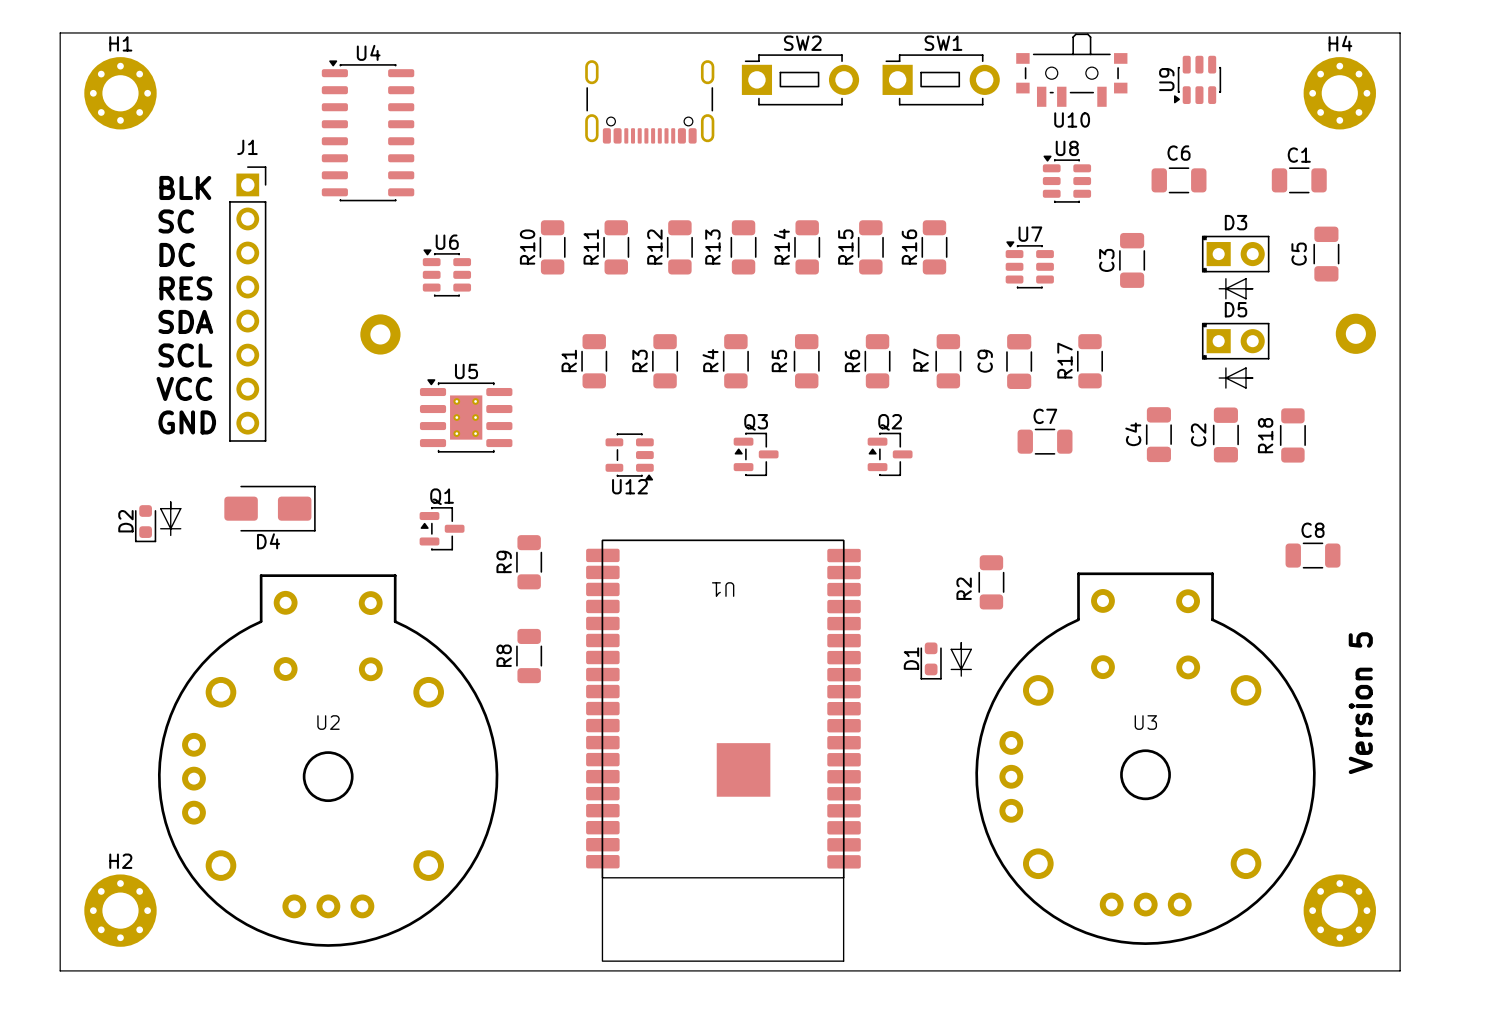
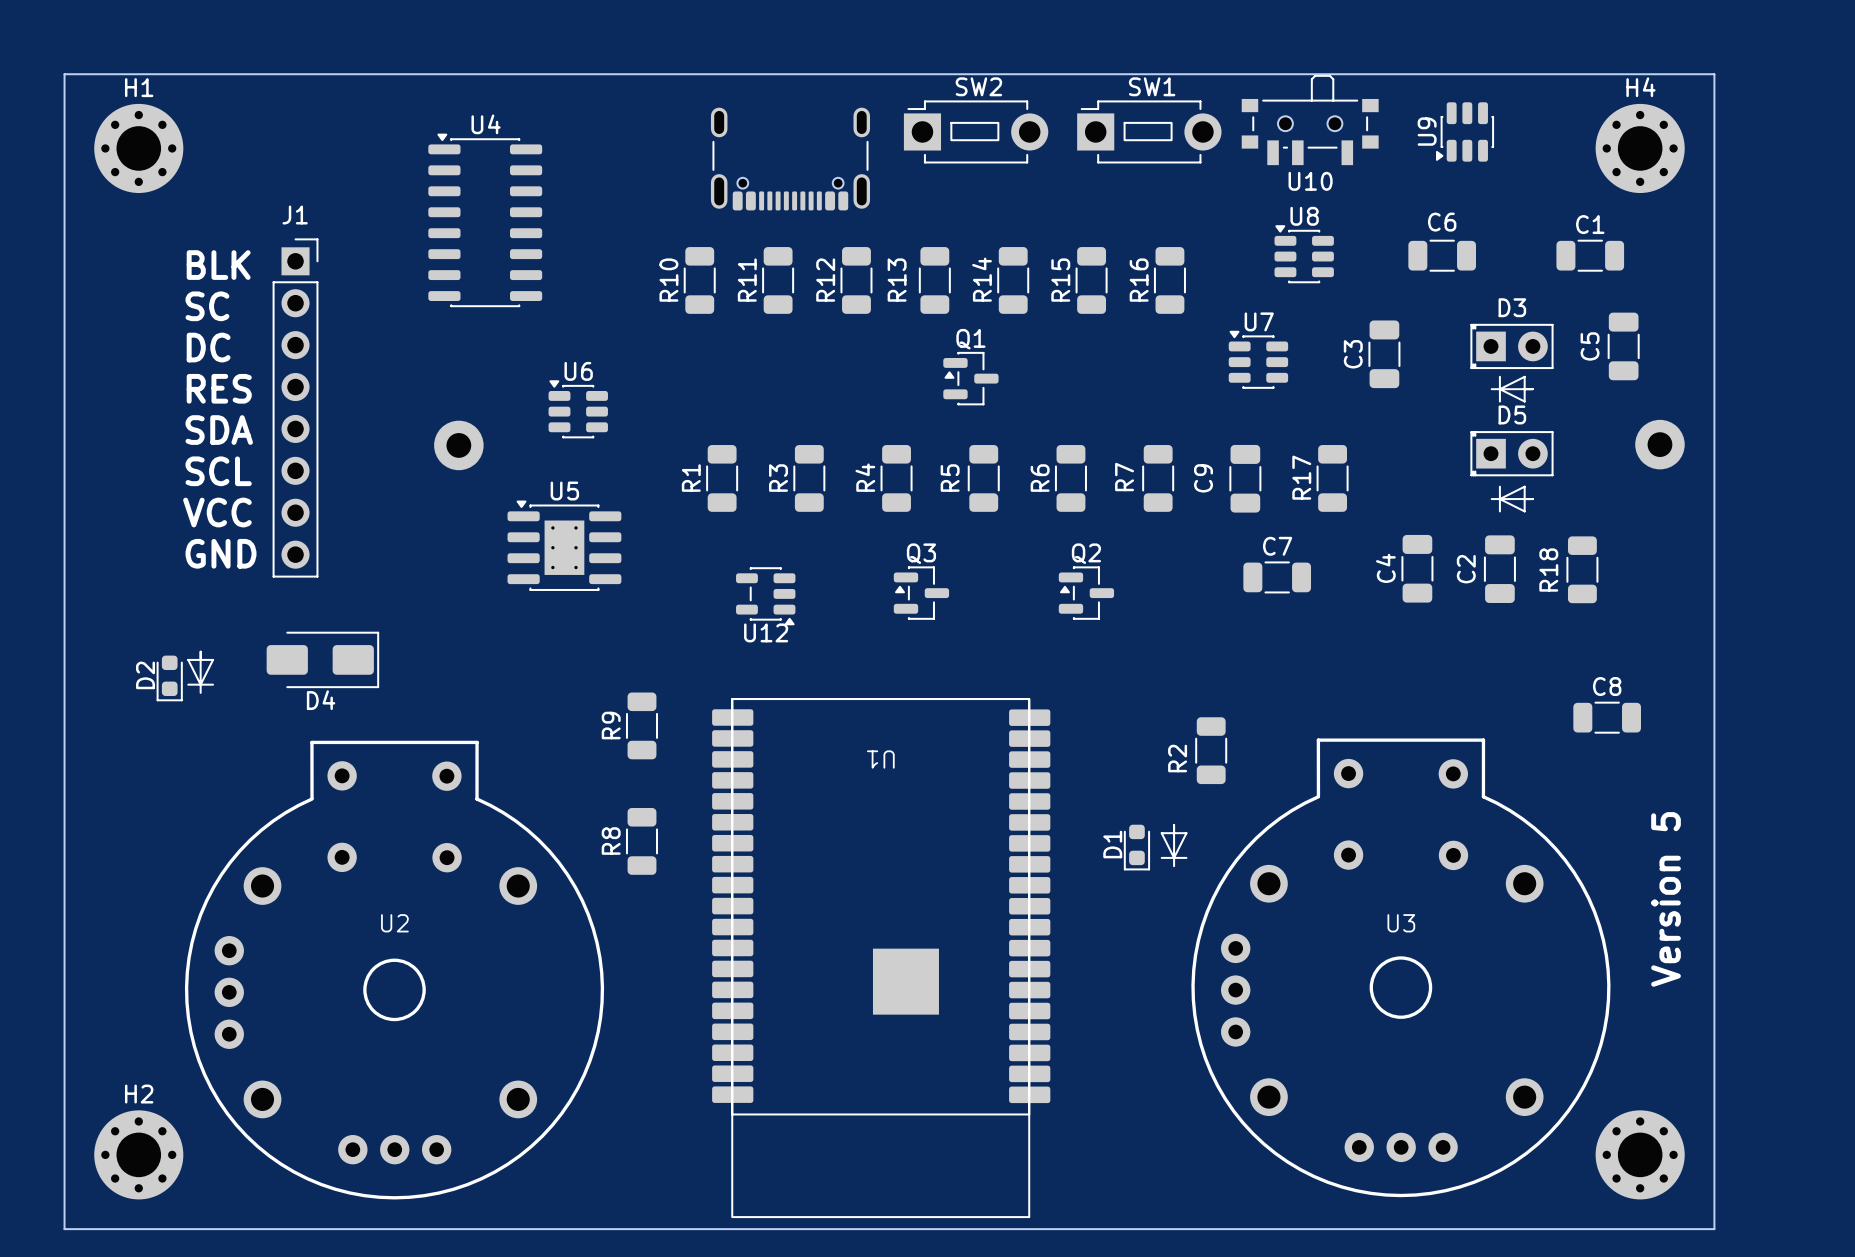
U4 position: (368, 130) -> (485, 220)
R10 position: (552, 247) -> (699, 280)
R11 position: (616, 247) -> (778, 280)
R12 position: (679, 247) -> (856, 280)
R13 position: (743, 247) -> (934, 280)
R14 position: (807, 247) -> (1013, 280)
R15 position: (870, 247) -> (1091, 280)
R16 position: (934, 247) -> (1169, 280)
U6 position: (446, 272) -> (578, 409)
Q1 position: (442, 528) -> (970, 378)

